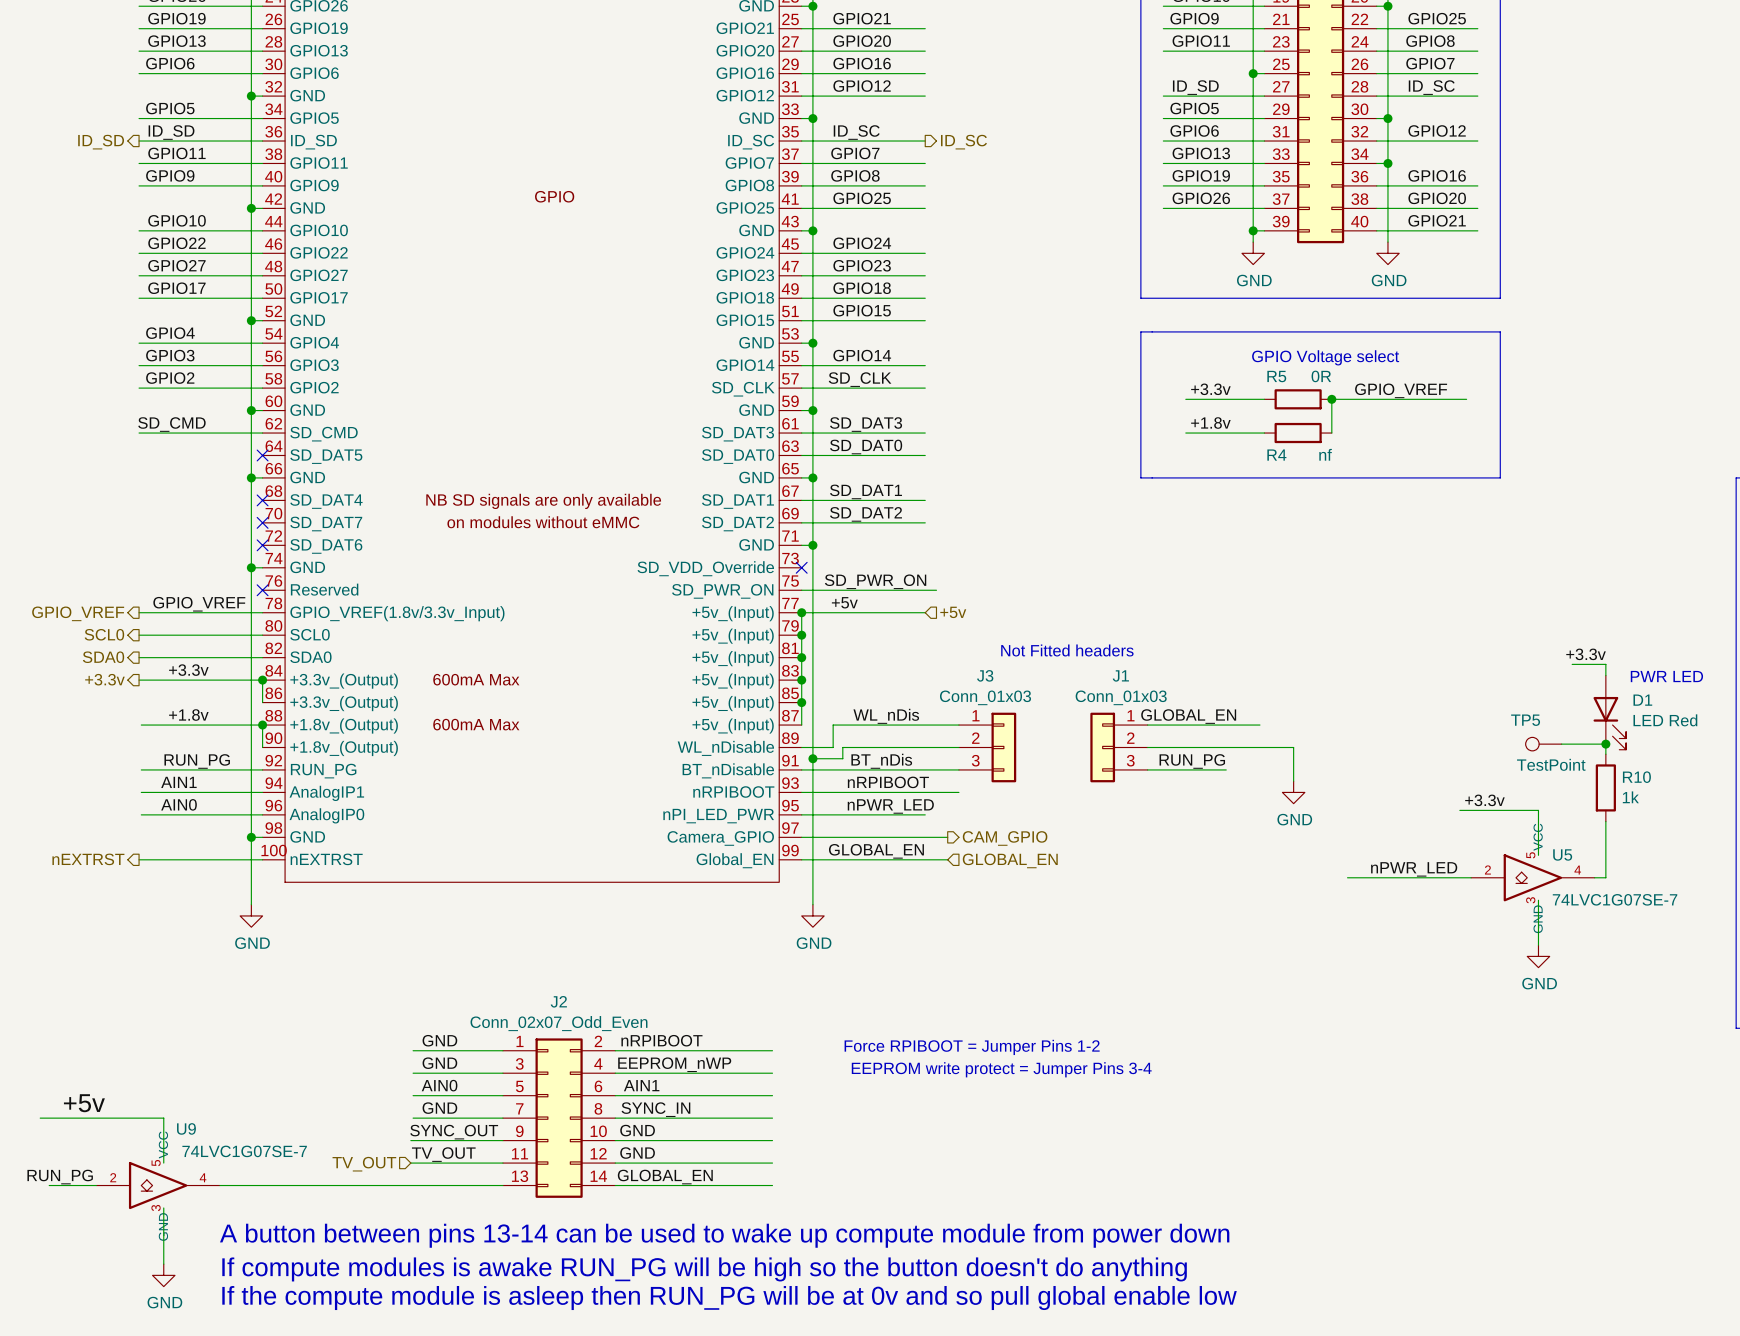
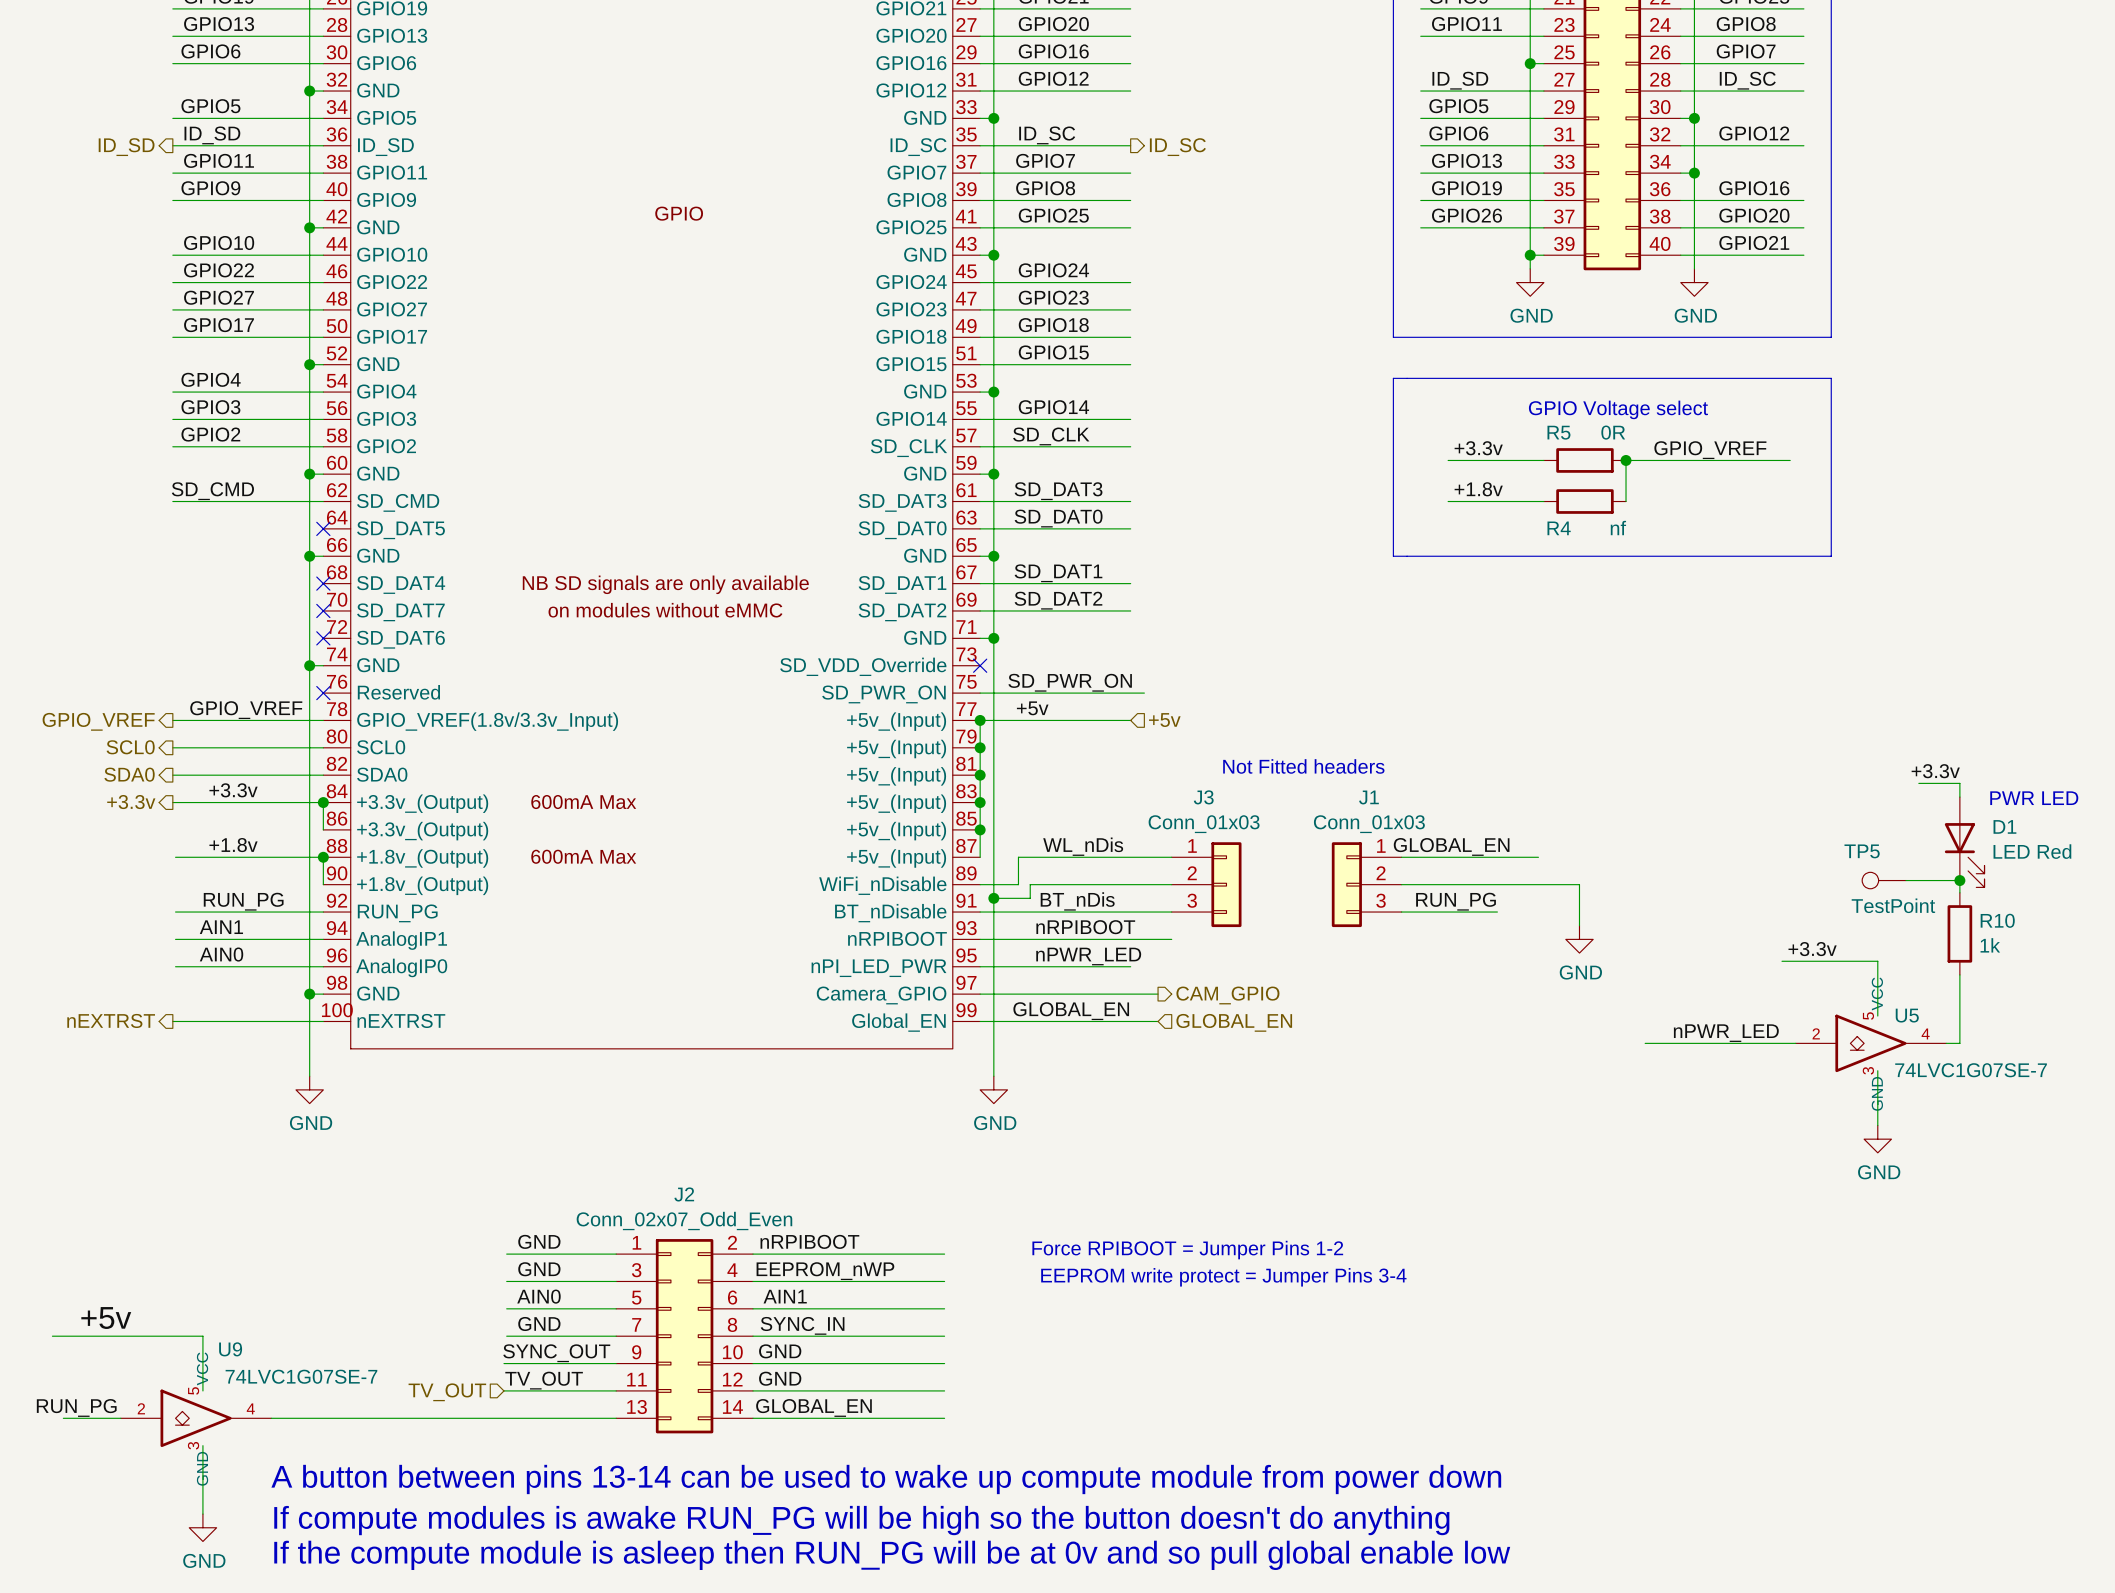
part pin name: WL_nDisable (725, 748) -> WiFi_nDisable (882, 885)

